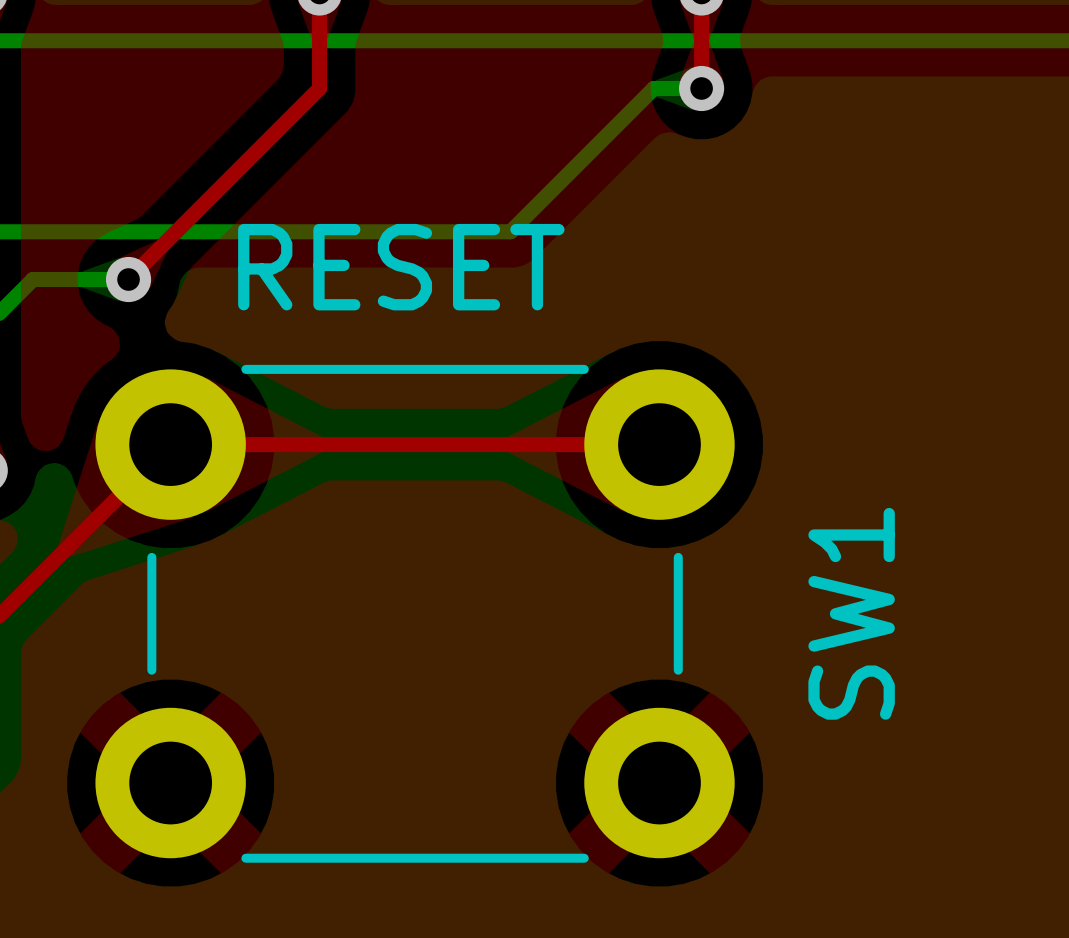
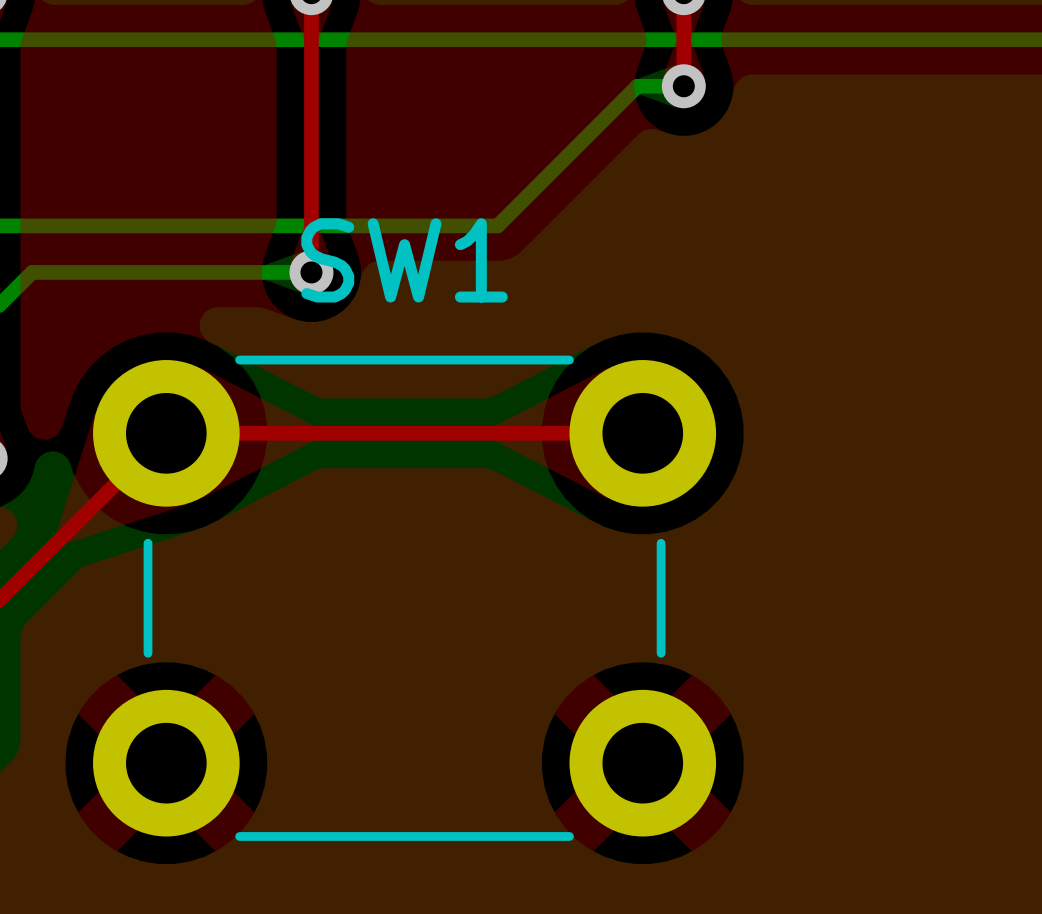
top track: (319, 88) (128, 279) -> (311, 86) (311, 272)
SW1 value: RESET (401, 267) -> none
bottom track: none -> (125, 272) (311, 272)
via position: (128, 279) -> (311, 272)
SW1 name rotation: 0° (851, 613) -> 90° clockwise (404, 260)
SW1 name position: SW1 (851, 613) -> SW1 (404, 260)

